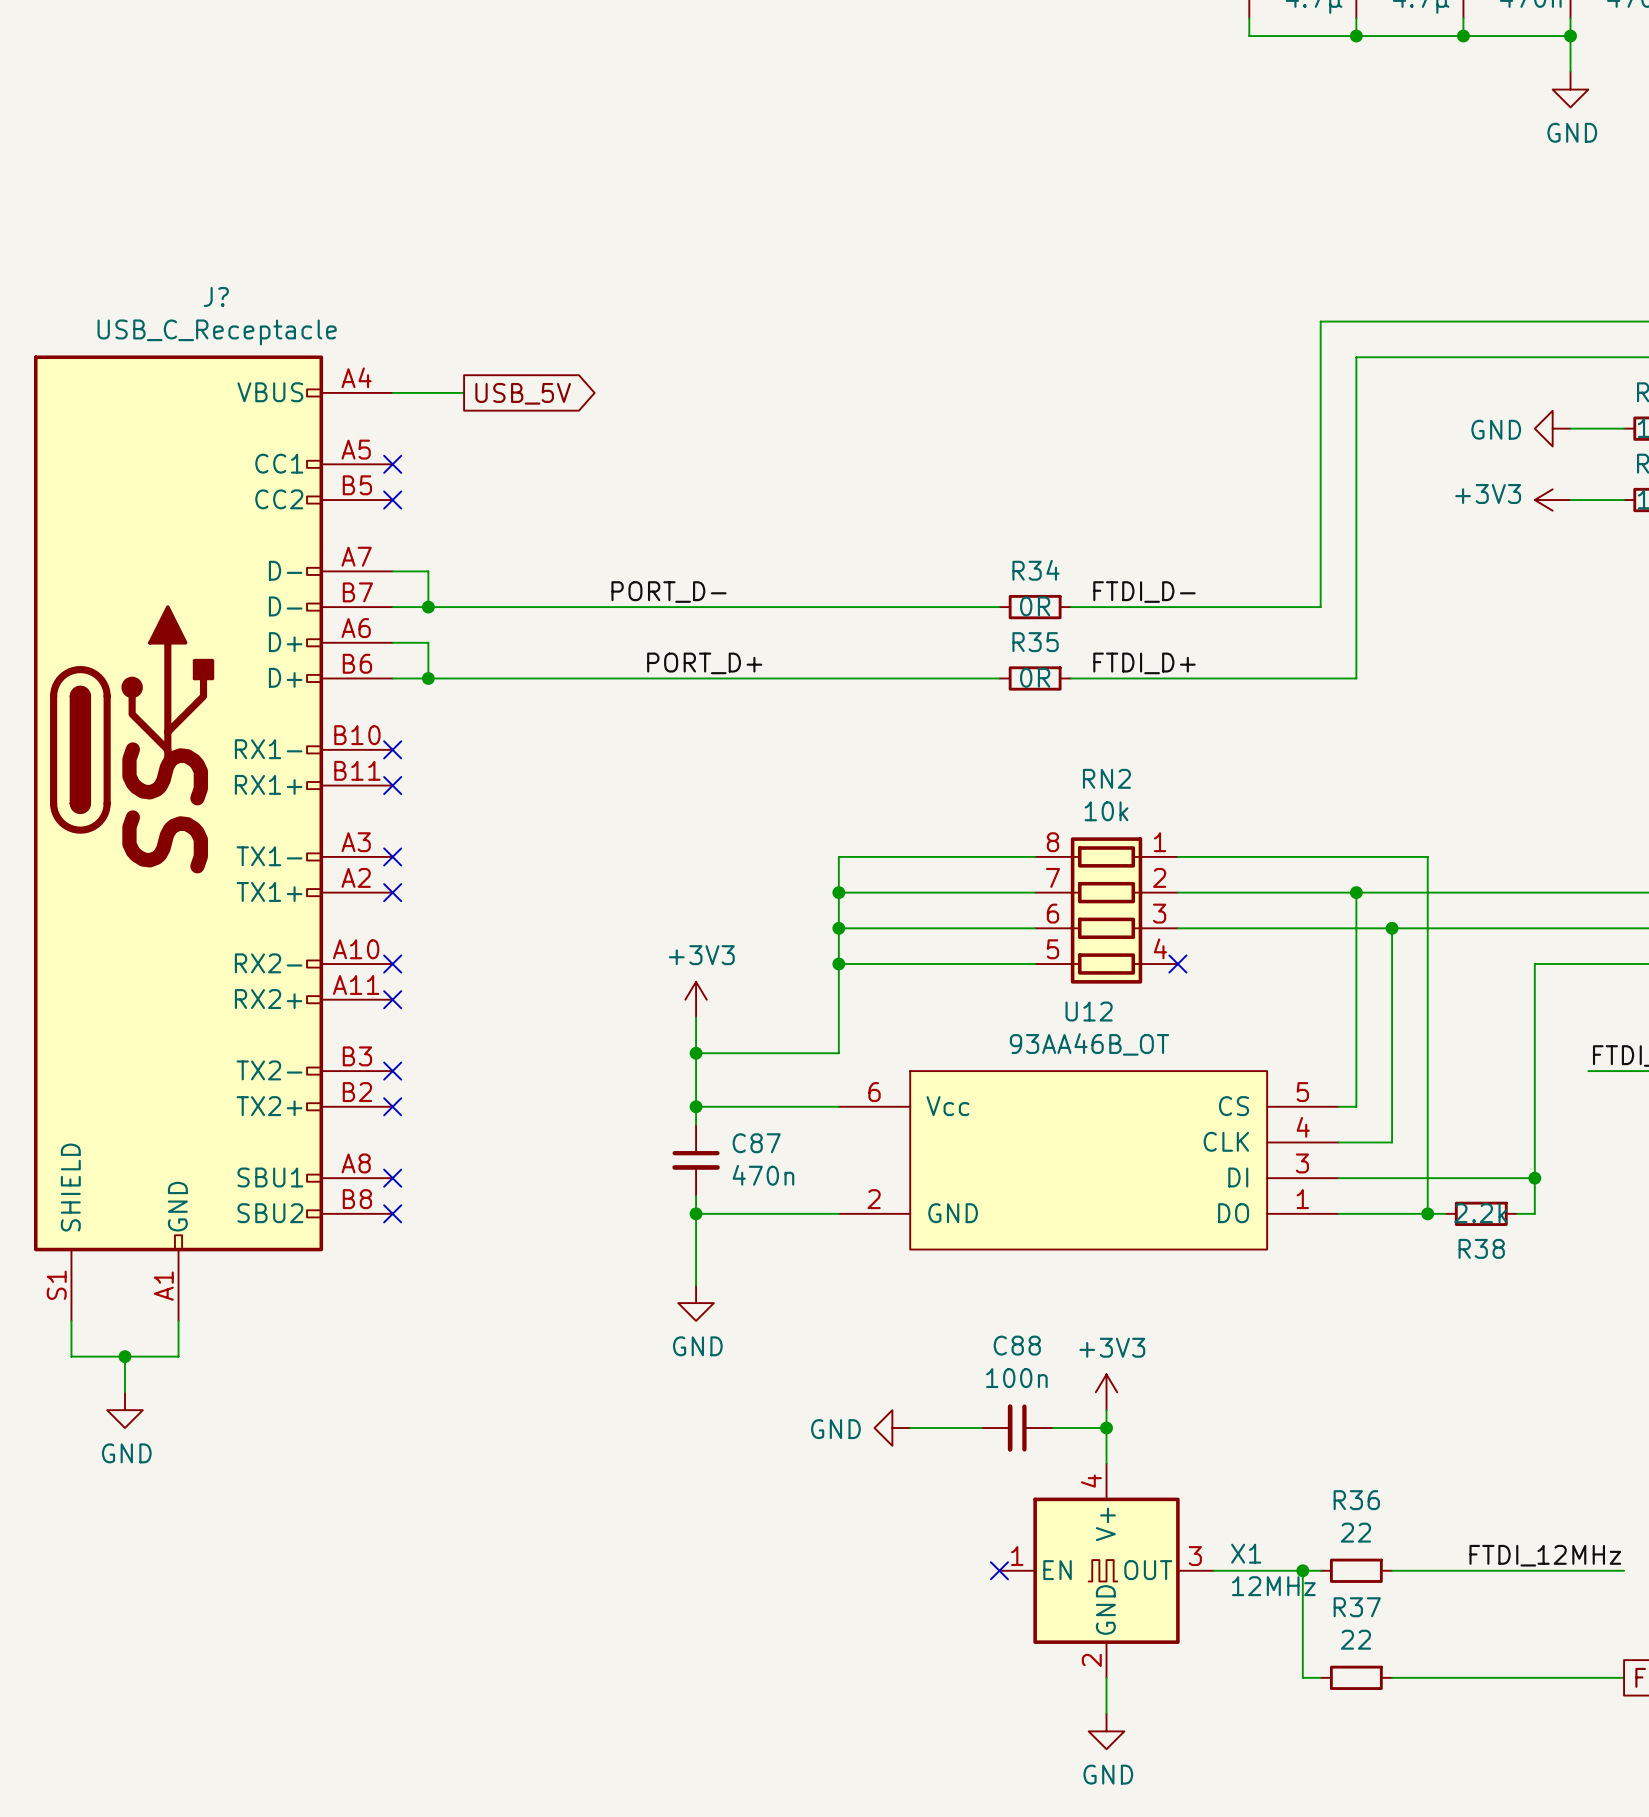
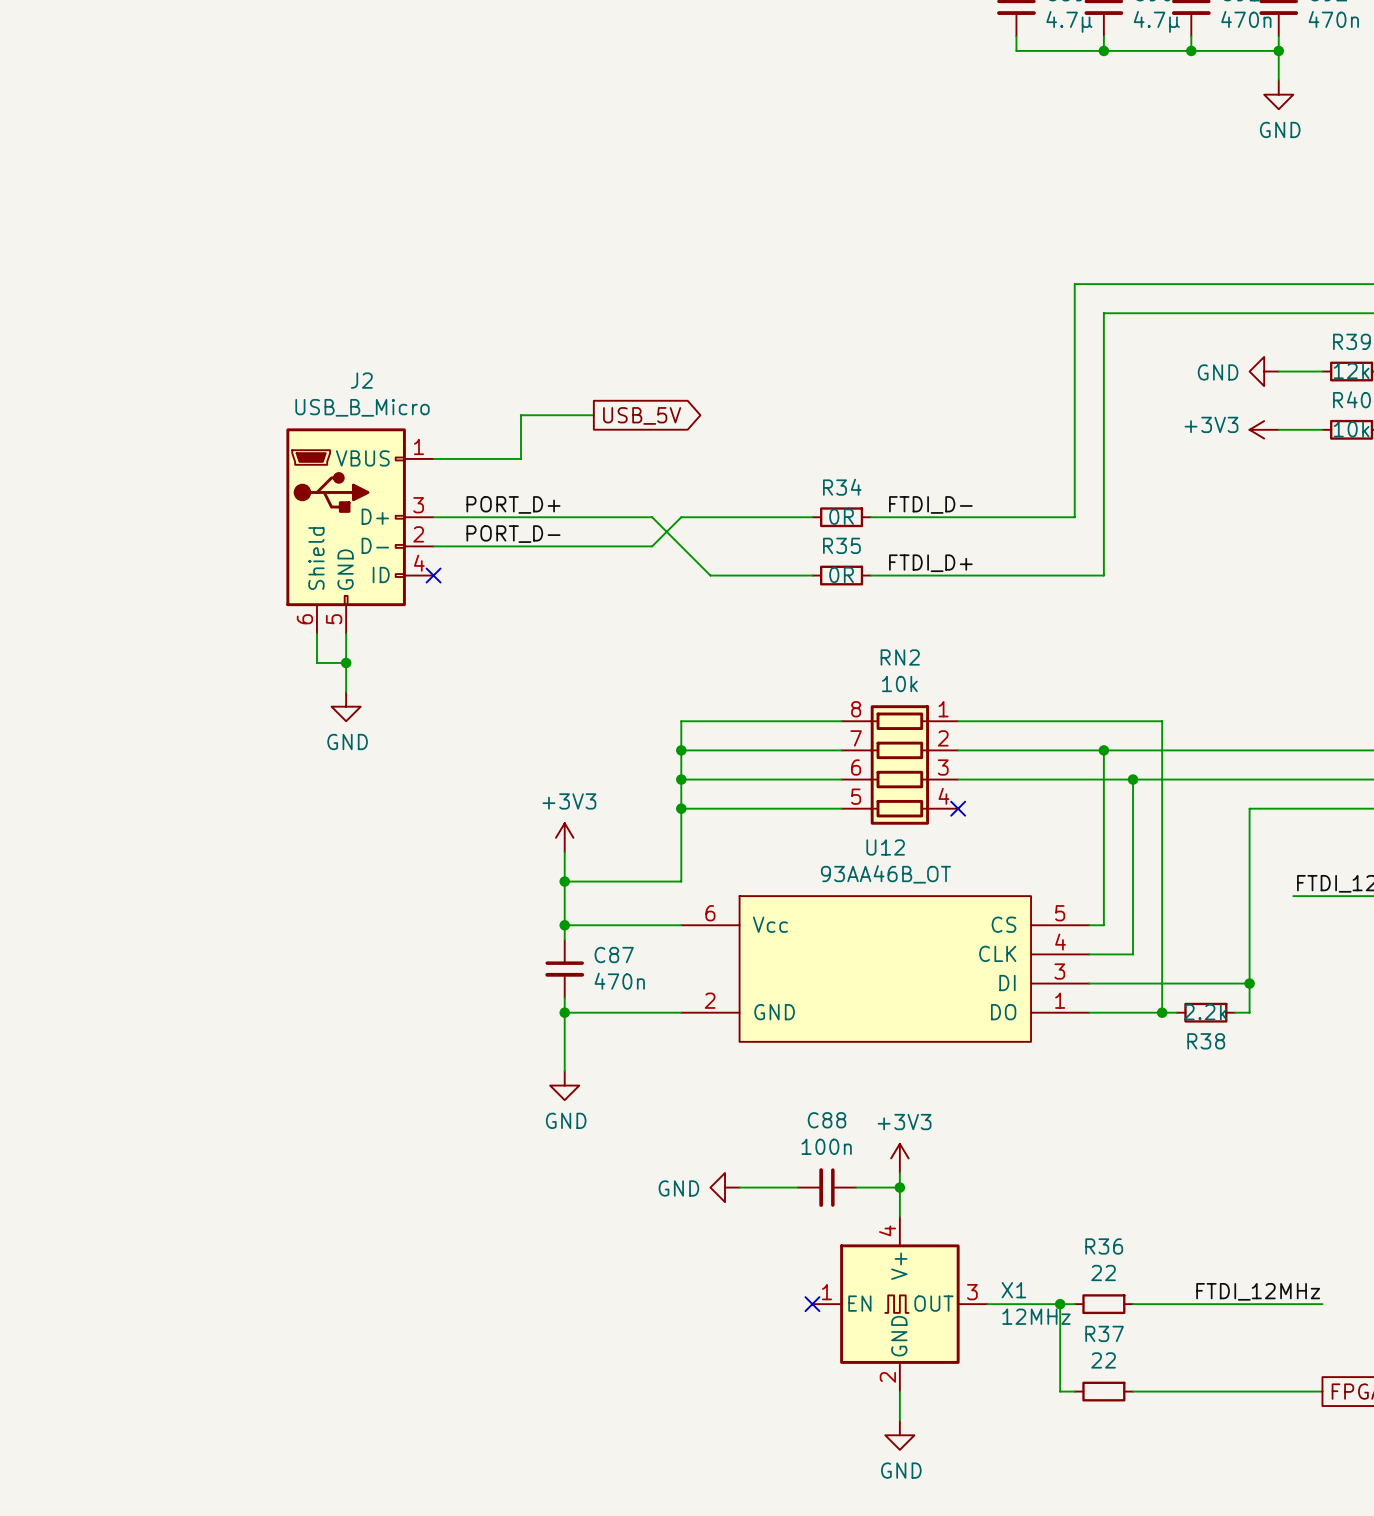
wire: (392, 392) (464, 392) -> none
global label position: USB_5V (523, 393) -> USB_5V (642, 415)
no-connect mark: (392, 464) -> none
wire: none -> (593, 415) (521, 415) (521, 458) (433, 458)
no-connect mark: (392, 500) -> none
label position: PORT_D- (669, 592) -> PORT_D- (513, 534)
junction: (428, 607) -> none
wire: (803, 607) (838, 607) -> (652, 517) (710, 575)
wire: none -> (681, 517) (652, 546) (433, 546)
J2: none -> USB_B_Micro (359, 531)
label position: PORT_D+ (704, 663) -> PORT_D+ (513, 504)
wire: (392, 678) (874, 678) -> none
junction: (428, 678) -> none
no-connect mark: none -> (433, 575)
wire: none -> (316, 633) (316, 662) (346, 662)
no-connect mark: (392, 749) -> none
wire: none -> (346, 633) (346, 692)
no-connect mark: (392, 785) -> none
junction: none -> (346, 662)
J?: USB_C_Receptacle (213, 838) -> none
power symbol: none -> GND (346, 706)
no-connect mark: (392, 856) -> none
no-connect mark: (392, 892) -> none
no-connect mark: (392, 964) -> none
no-connect mark: (392, 999) -> none
no-connect mark: (392, 1071) -> none
no-connect mark: (392, 1106) -> none
no-connect mark: (392, 1178) -> none
no-connect mark: (392, 1213) -> none
wire: (71, 1320) (71, 1356) (178, 1356) (178, 1320) -> none
wire: (125, 1356) (125, 1392) -> none
junction: (125, 1356) -> none
power symbol: GND (125, 1410) -> none

